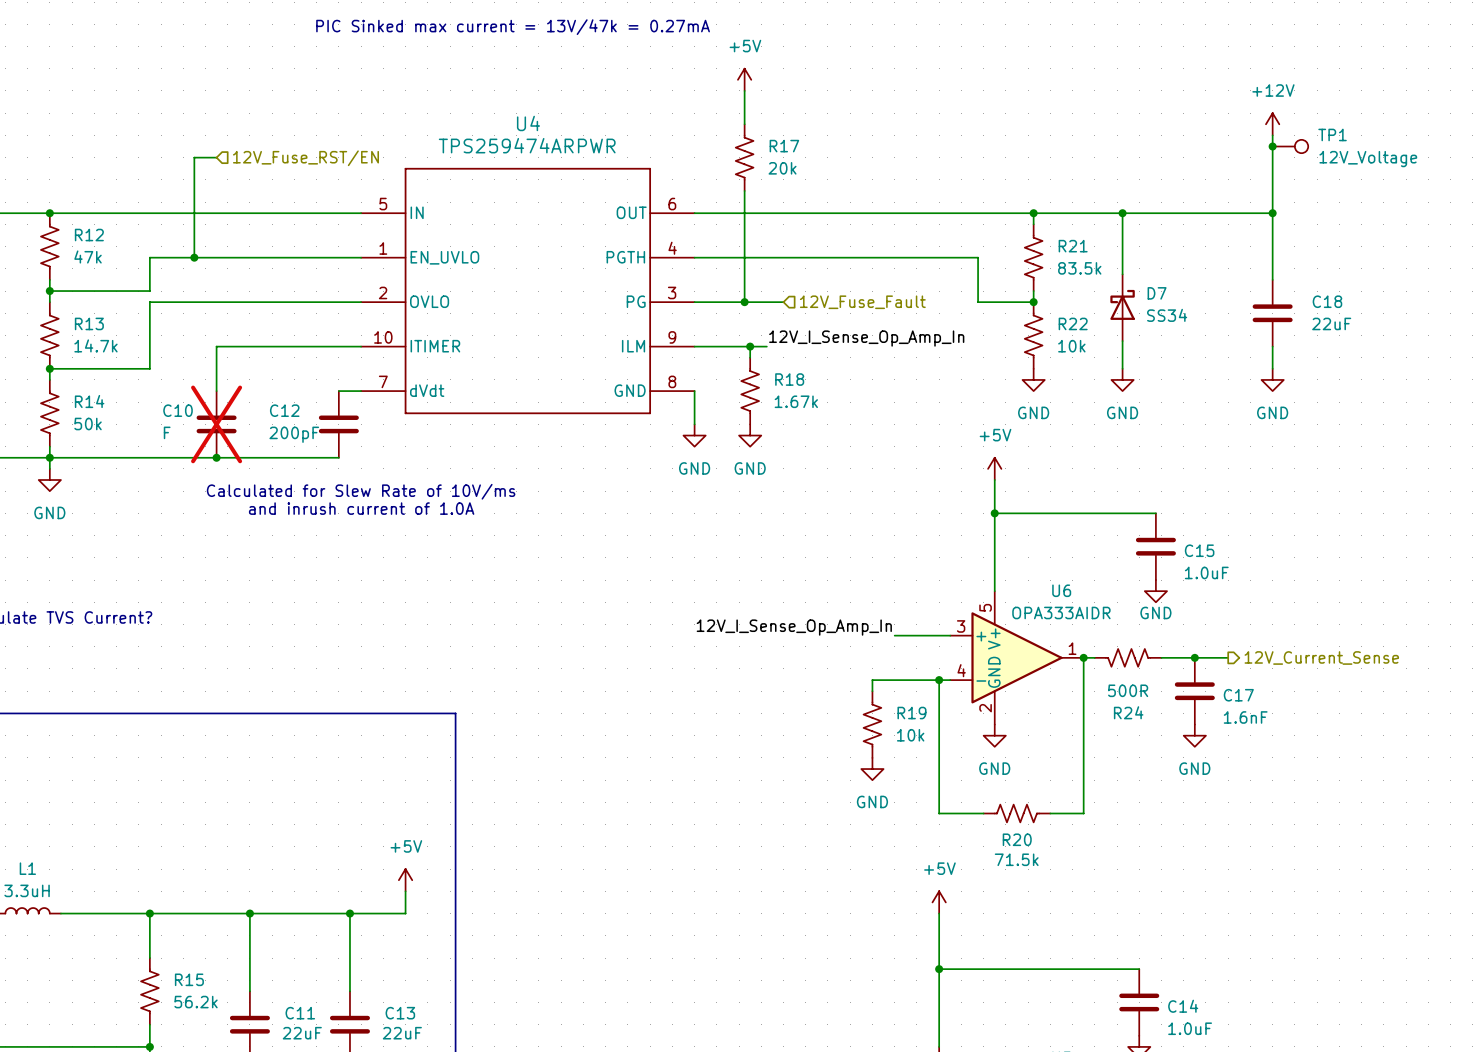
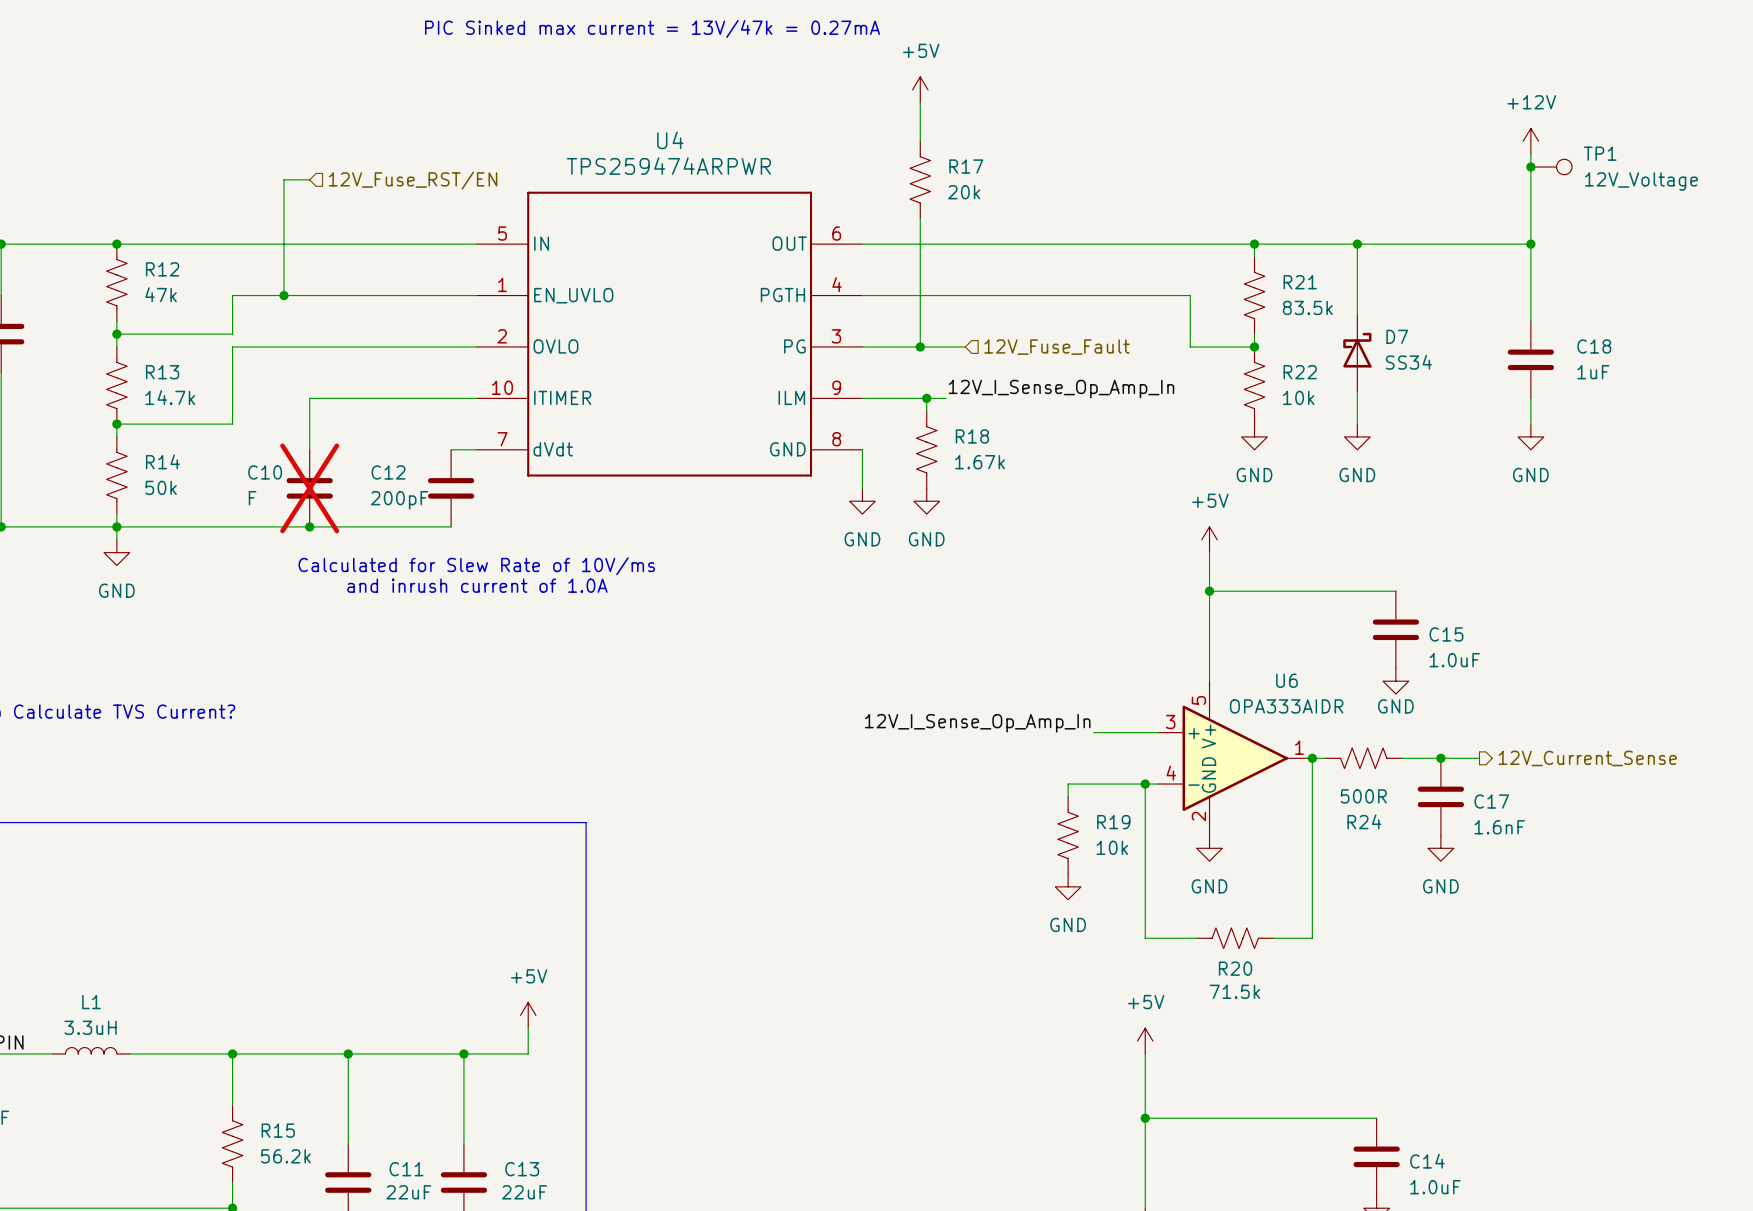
C18 value: 22uF (1331, 323) -> 1uF (1593, 372)

